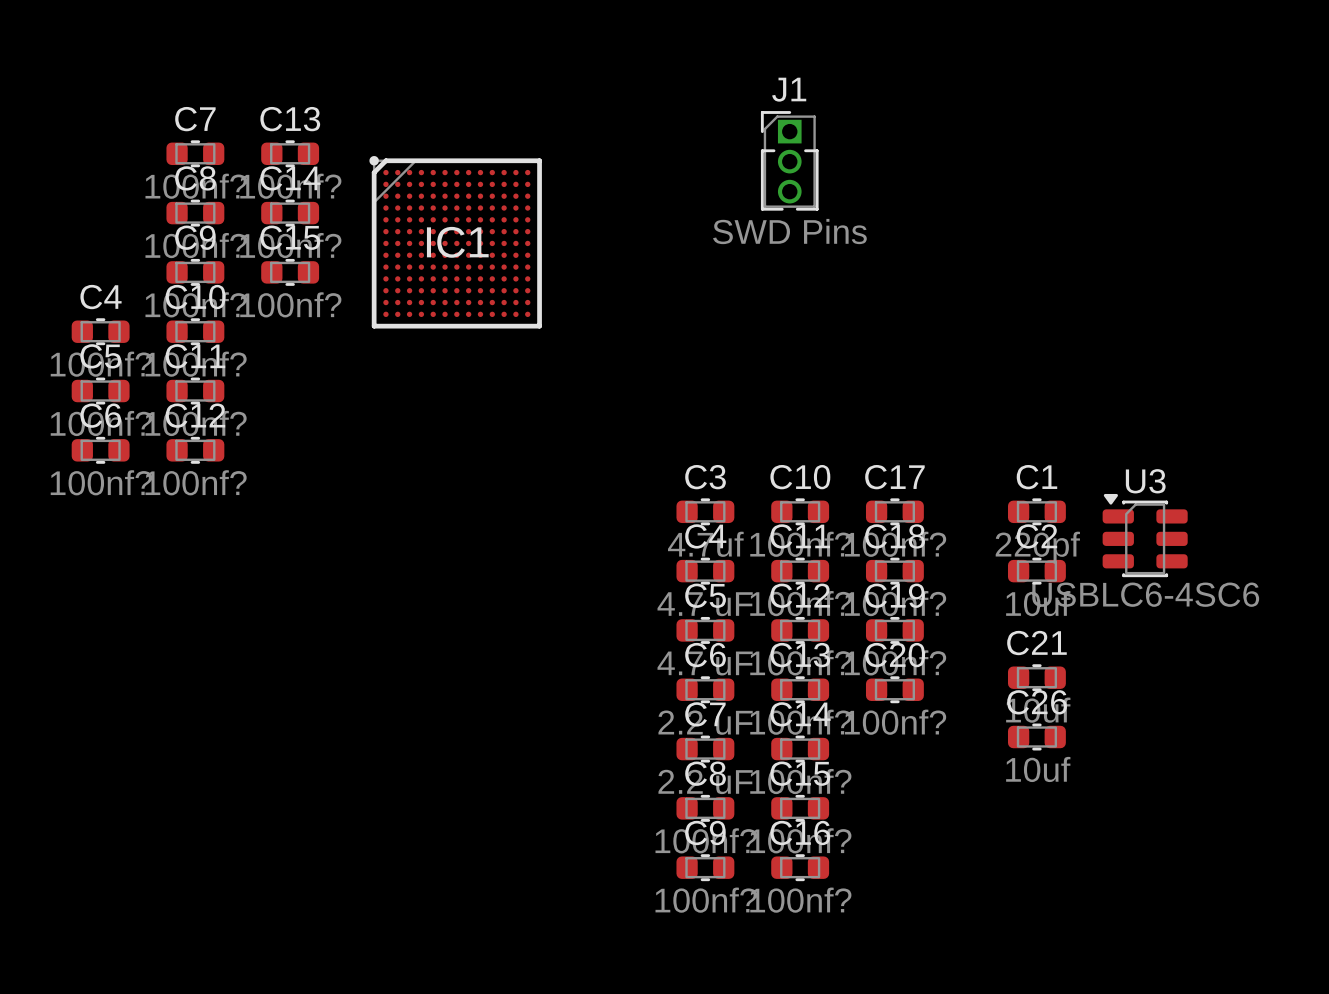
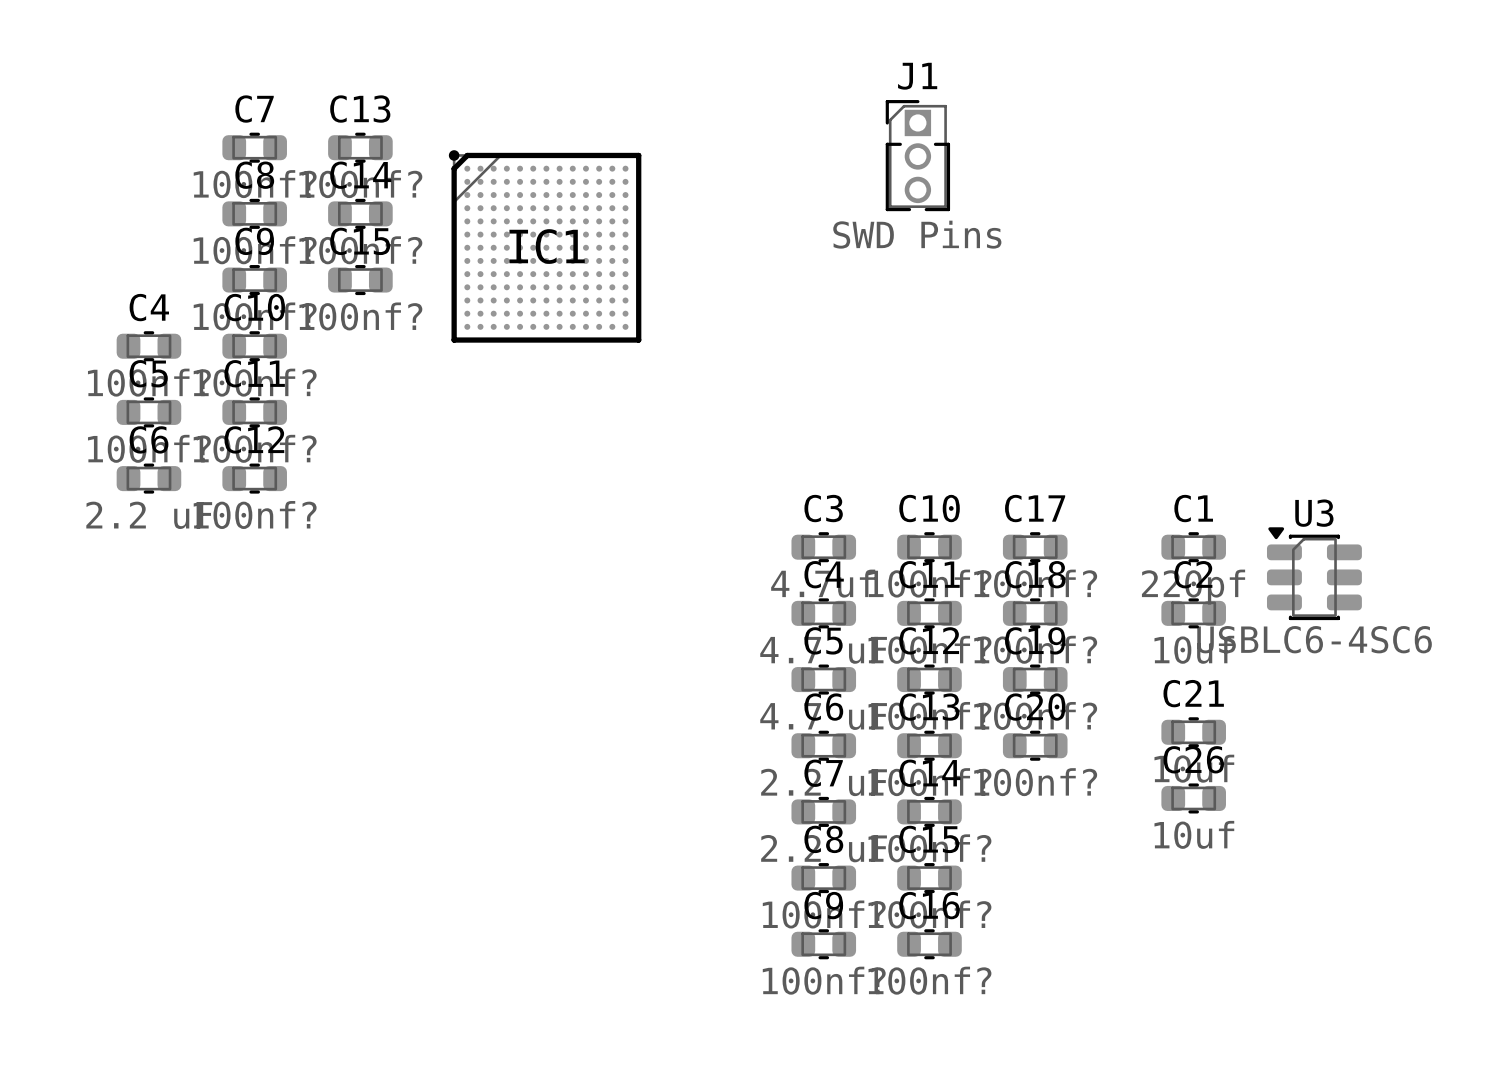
C6 value: 100nf? (101, 482) -> 2.2 uF (149, 515)

